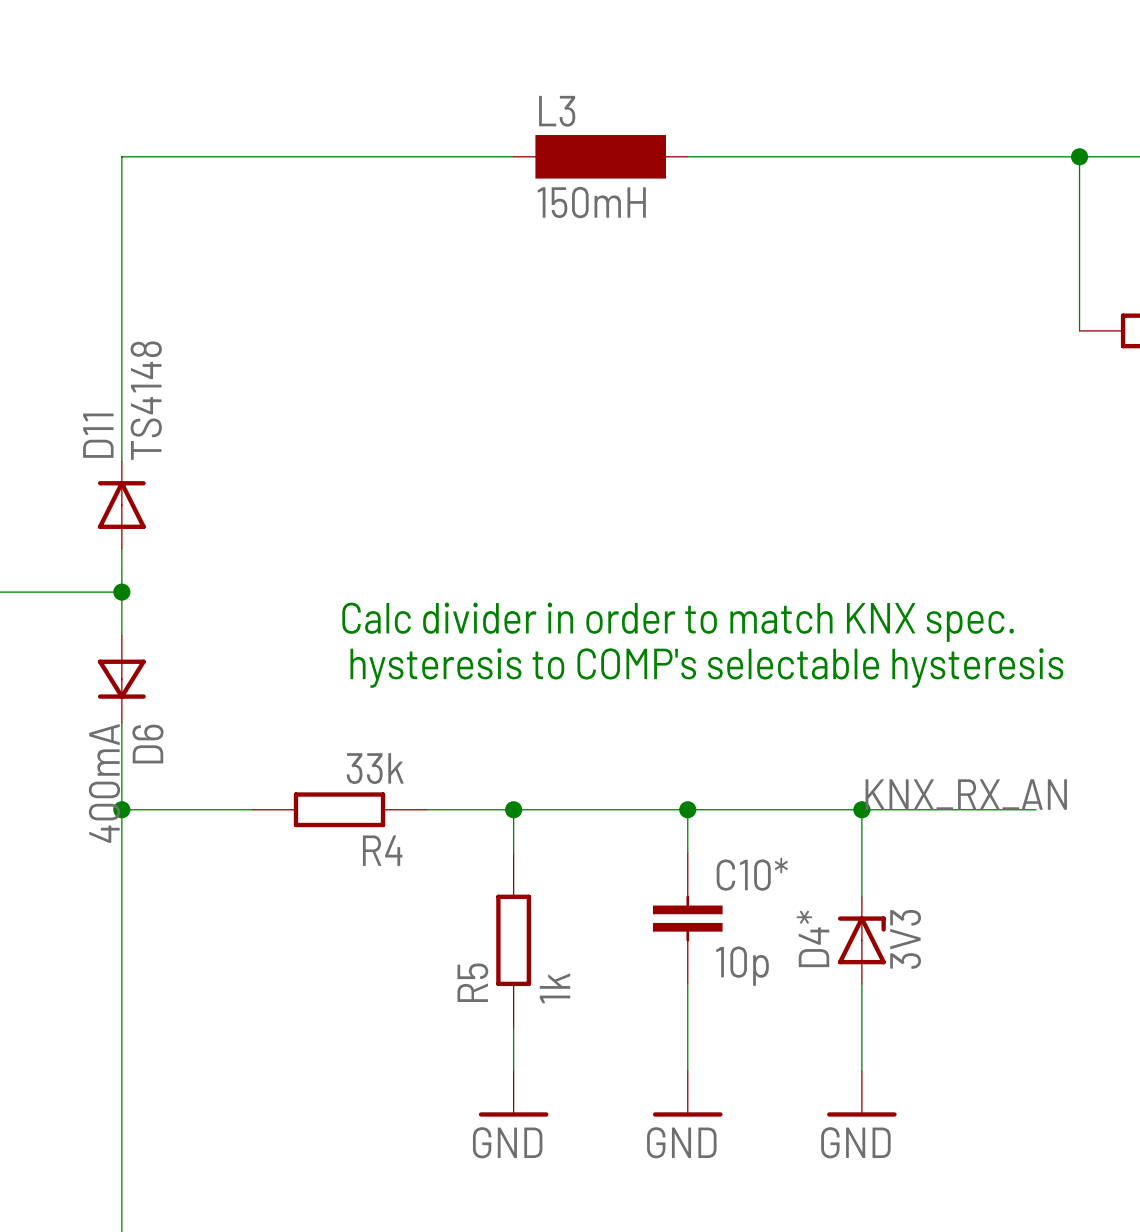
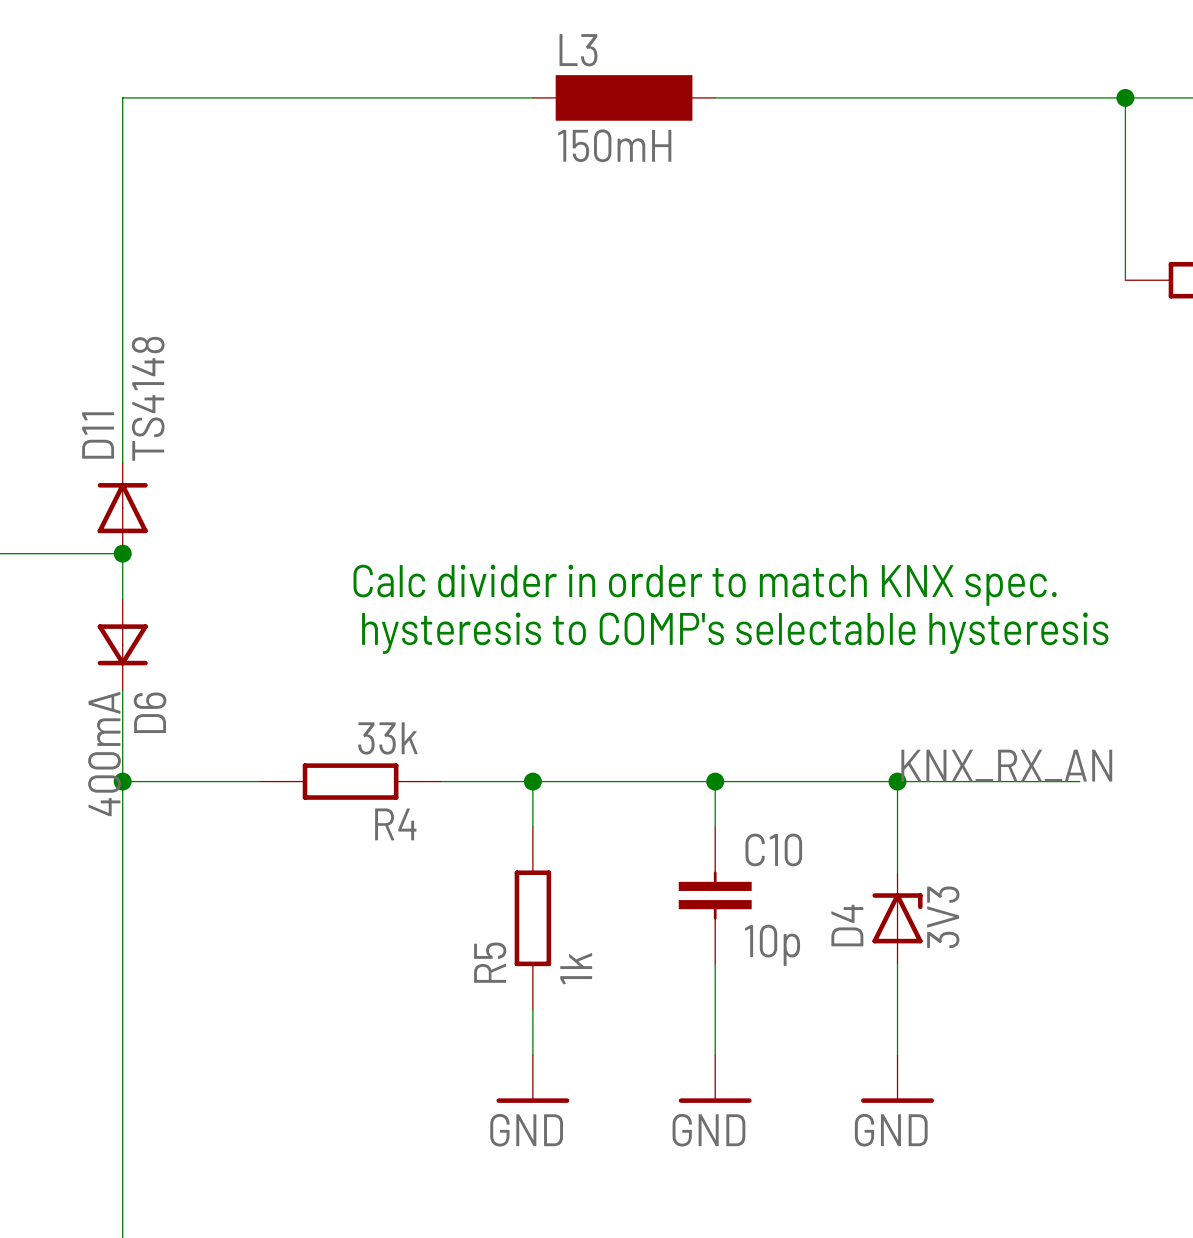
D11 position: (121, 505) -> (122, 508)
C10* name: C10* (752, 874) -> C10 (773, 849)
D4* name: D4* (812, 938) -> D4 (847, 925)

